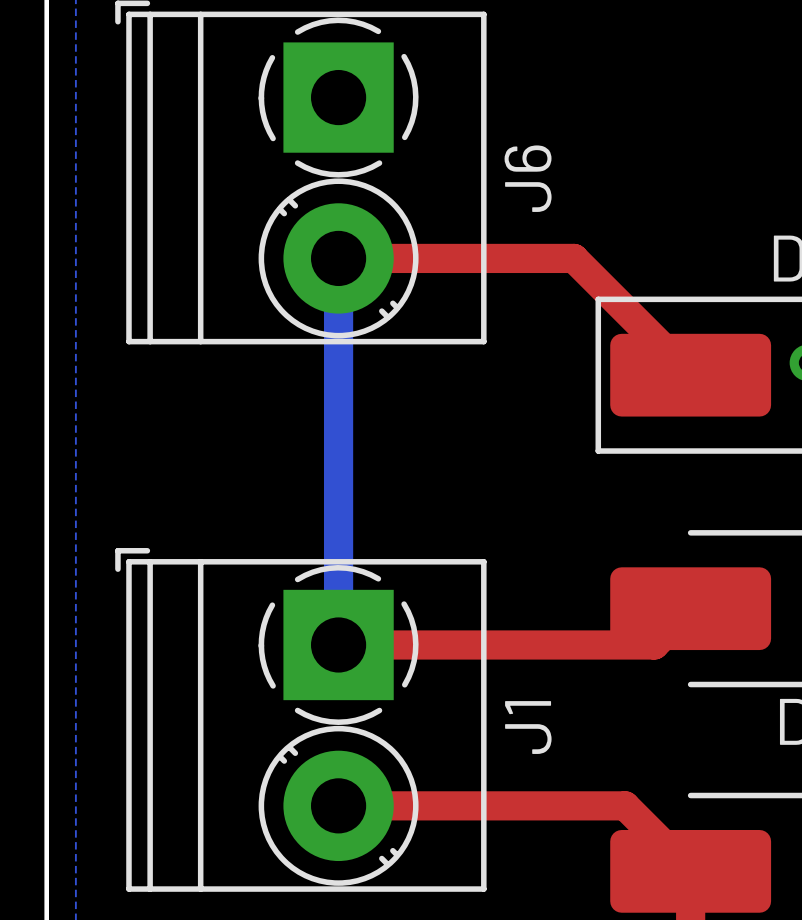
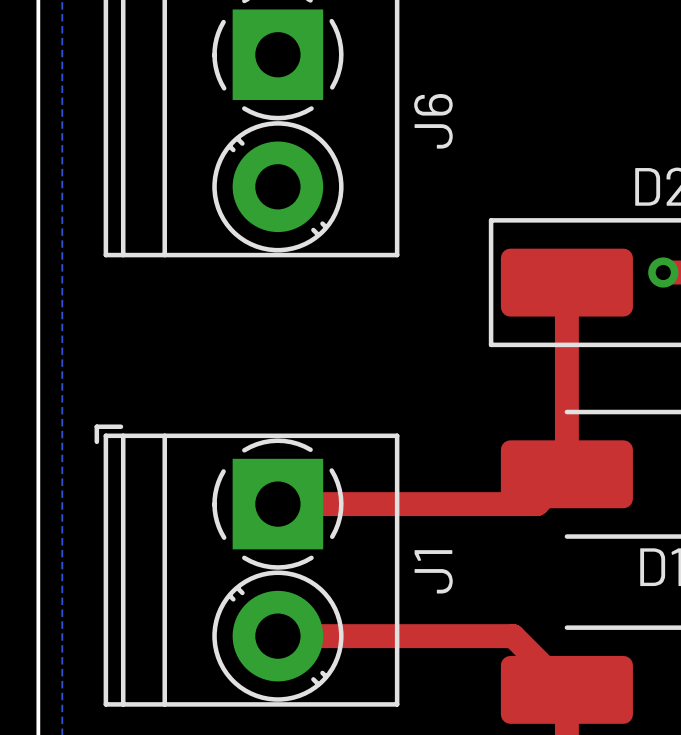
top track: (338, 258) (573, 258) (690, 375) -> (566, 474) (566, 282)
bottom track: (338, 258) (338, 644) -> none

